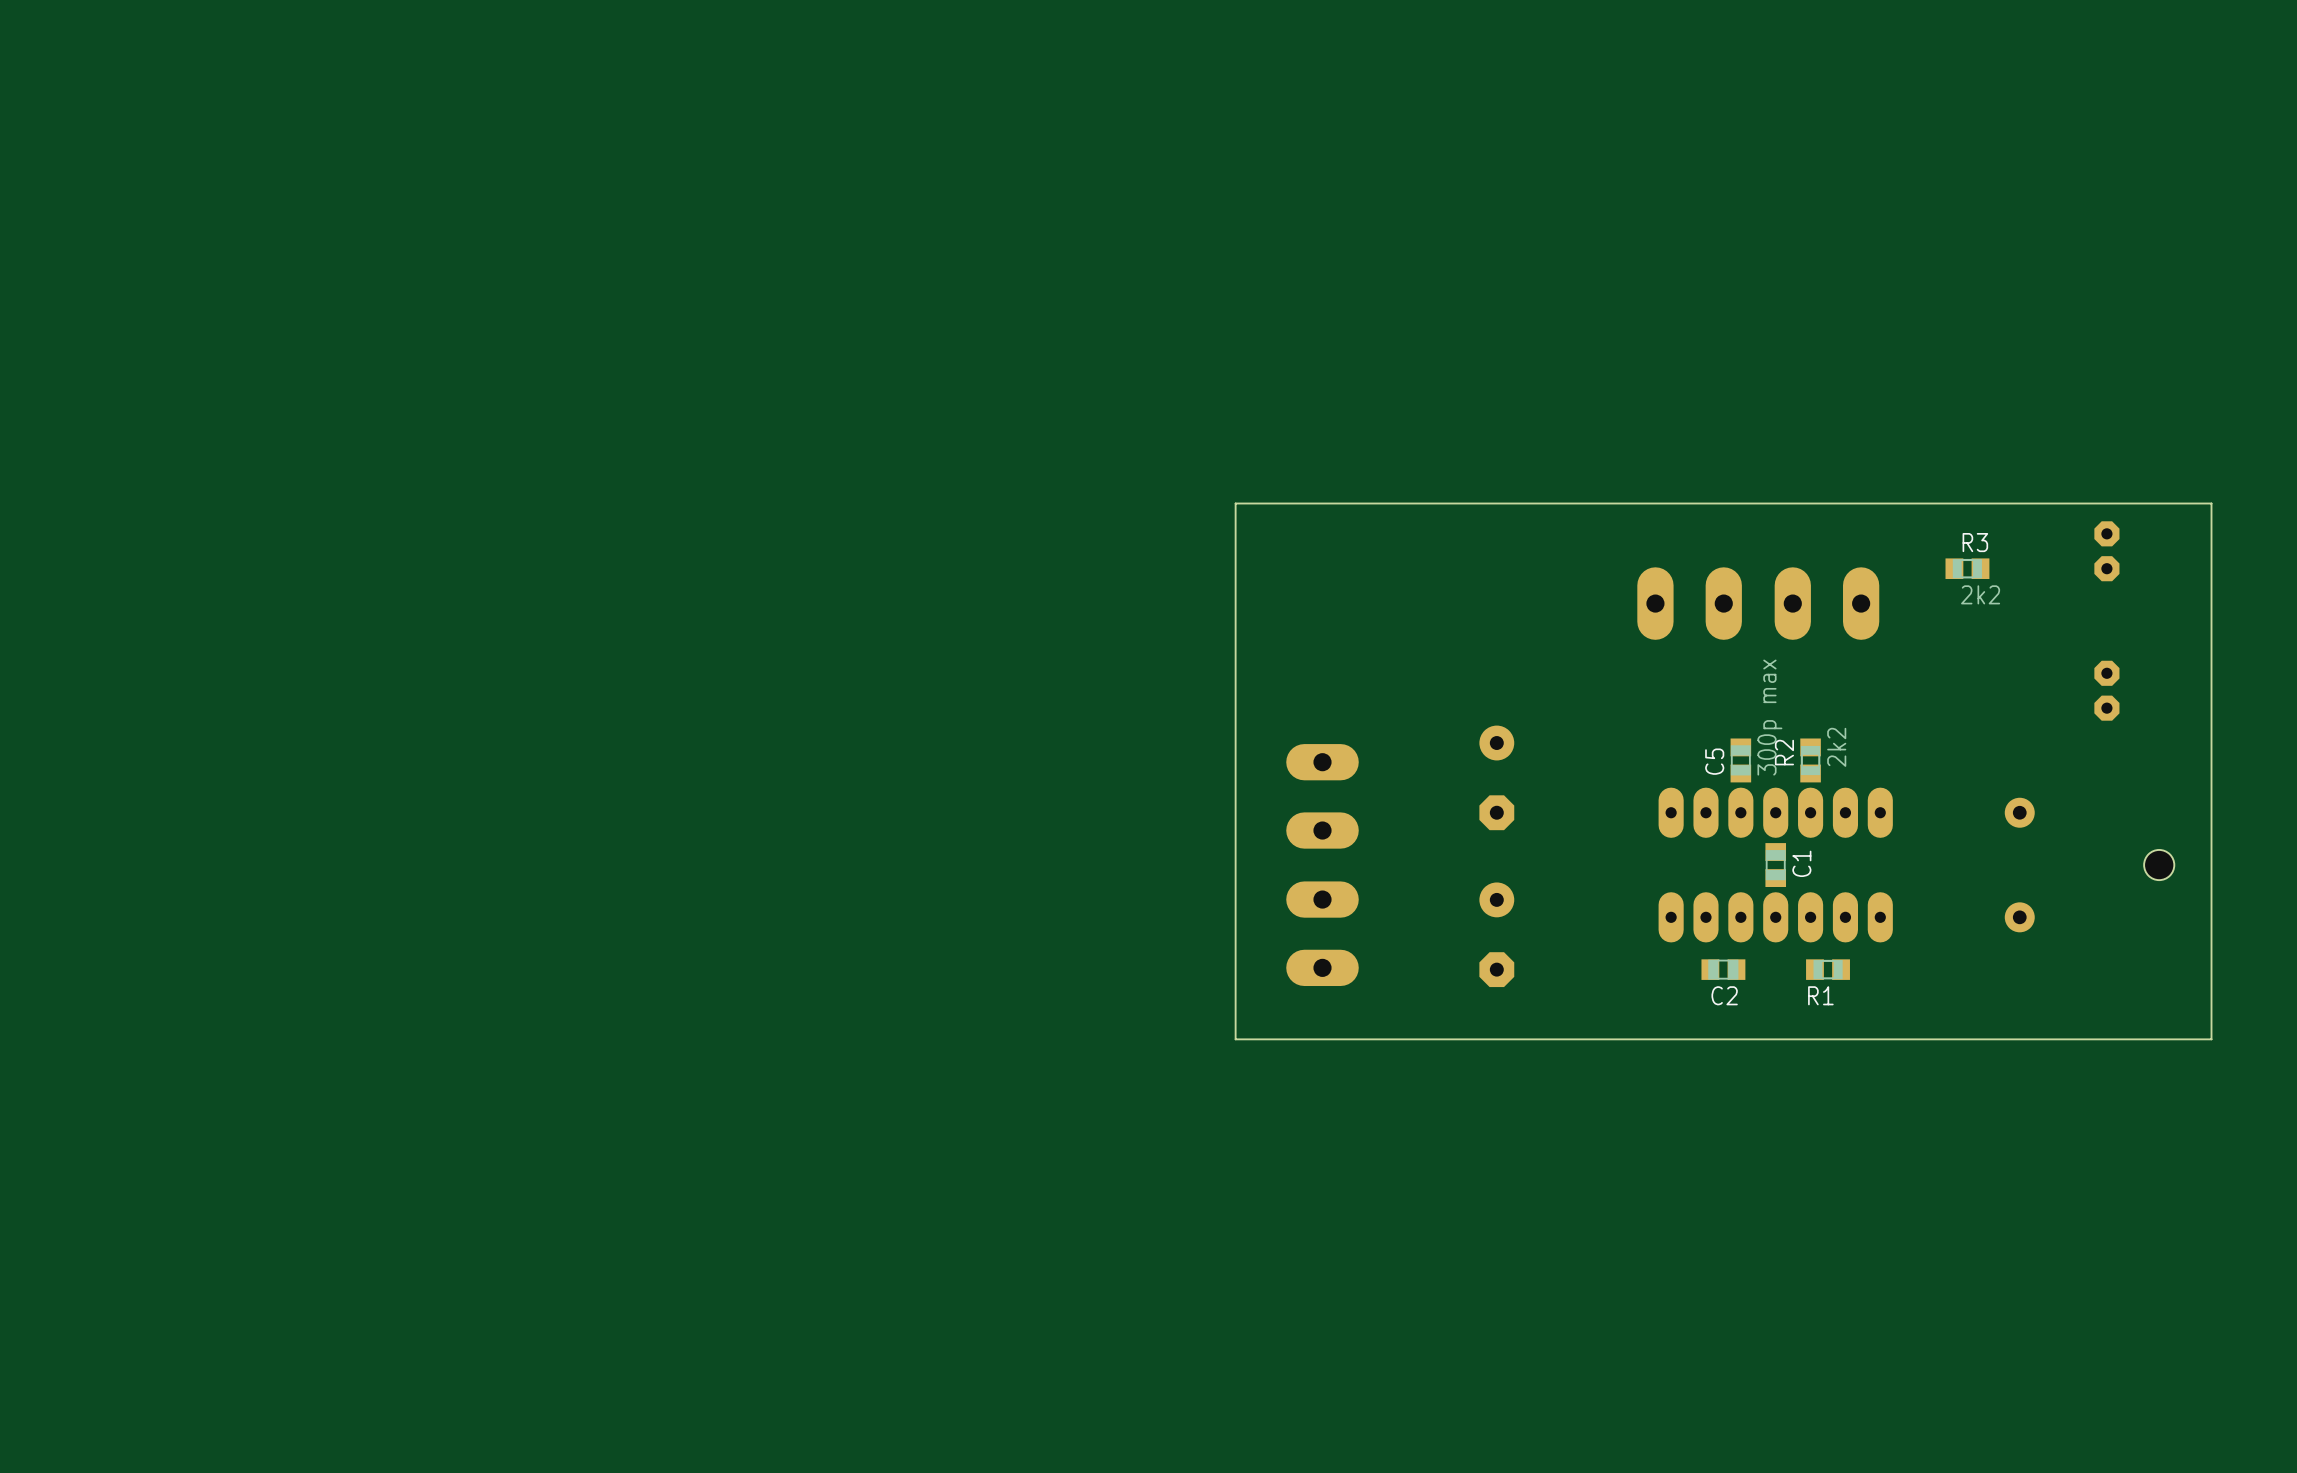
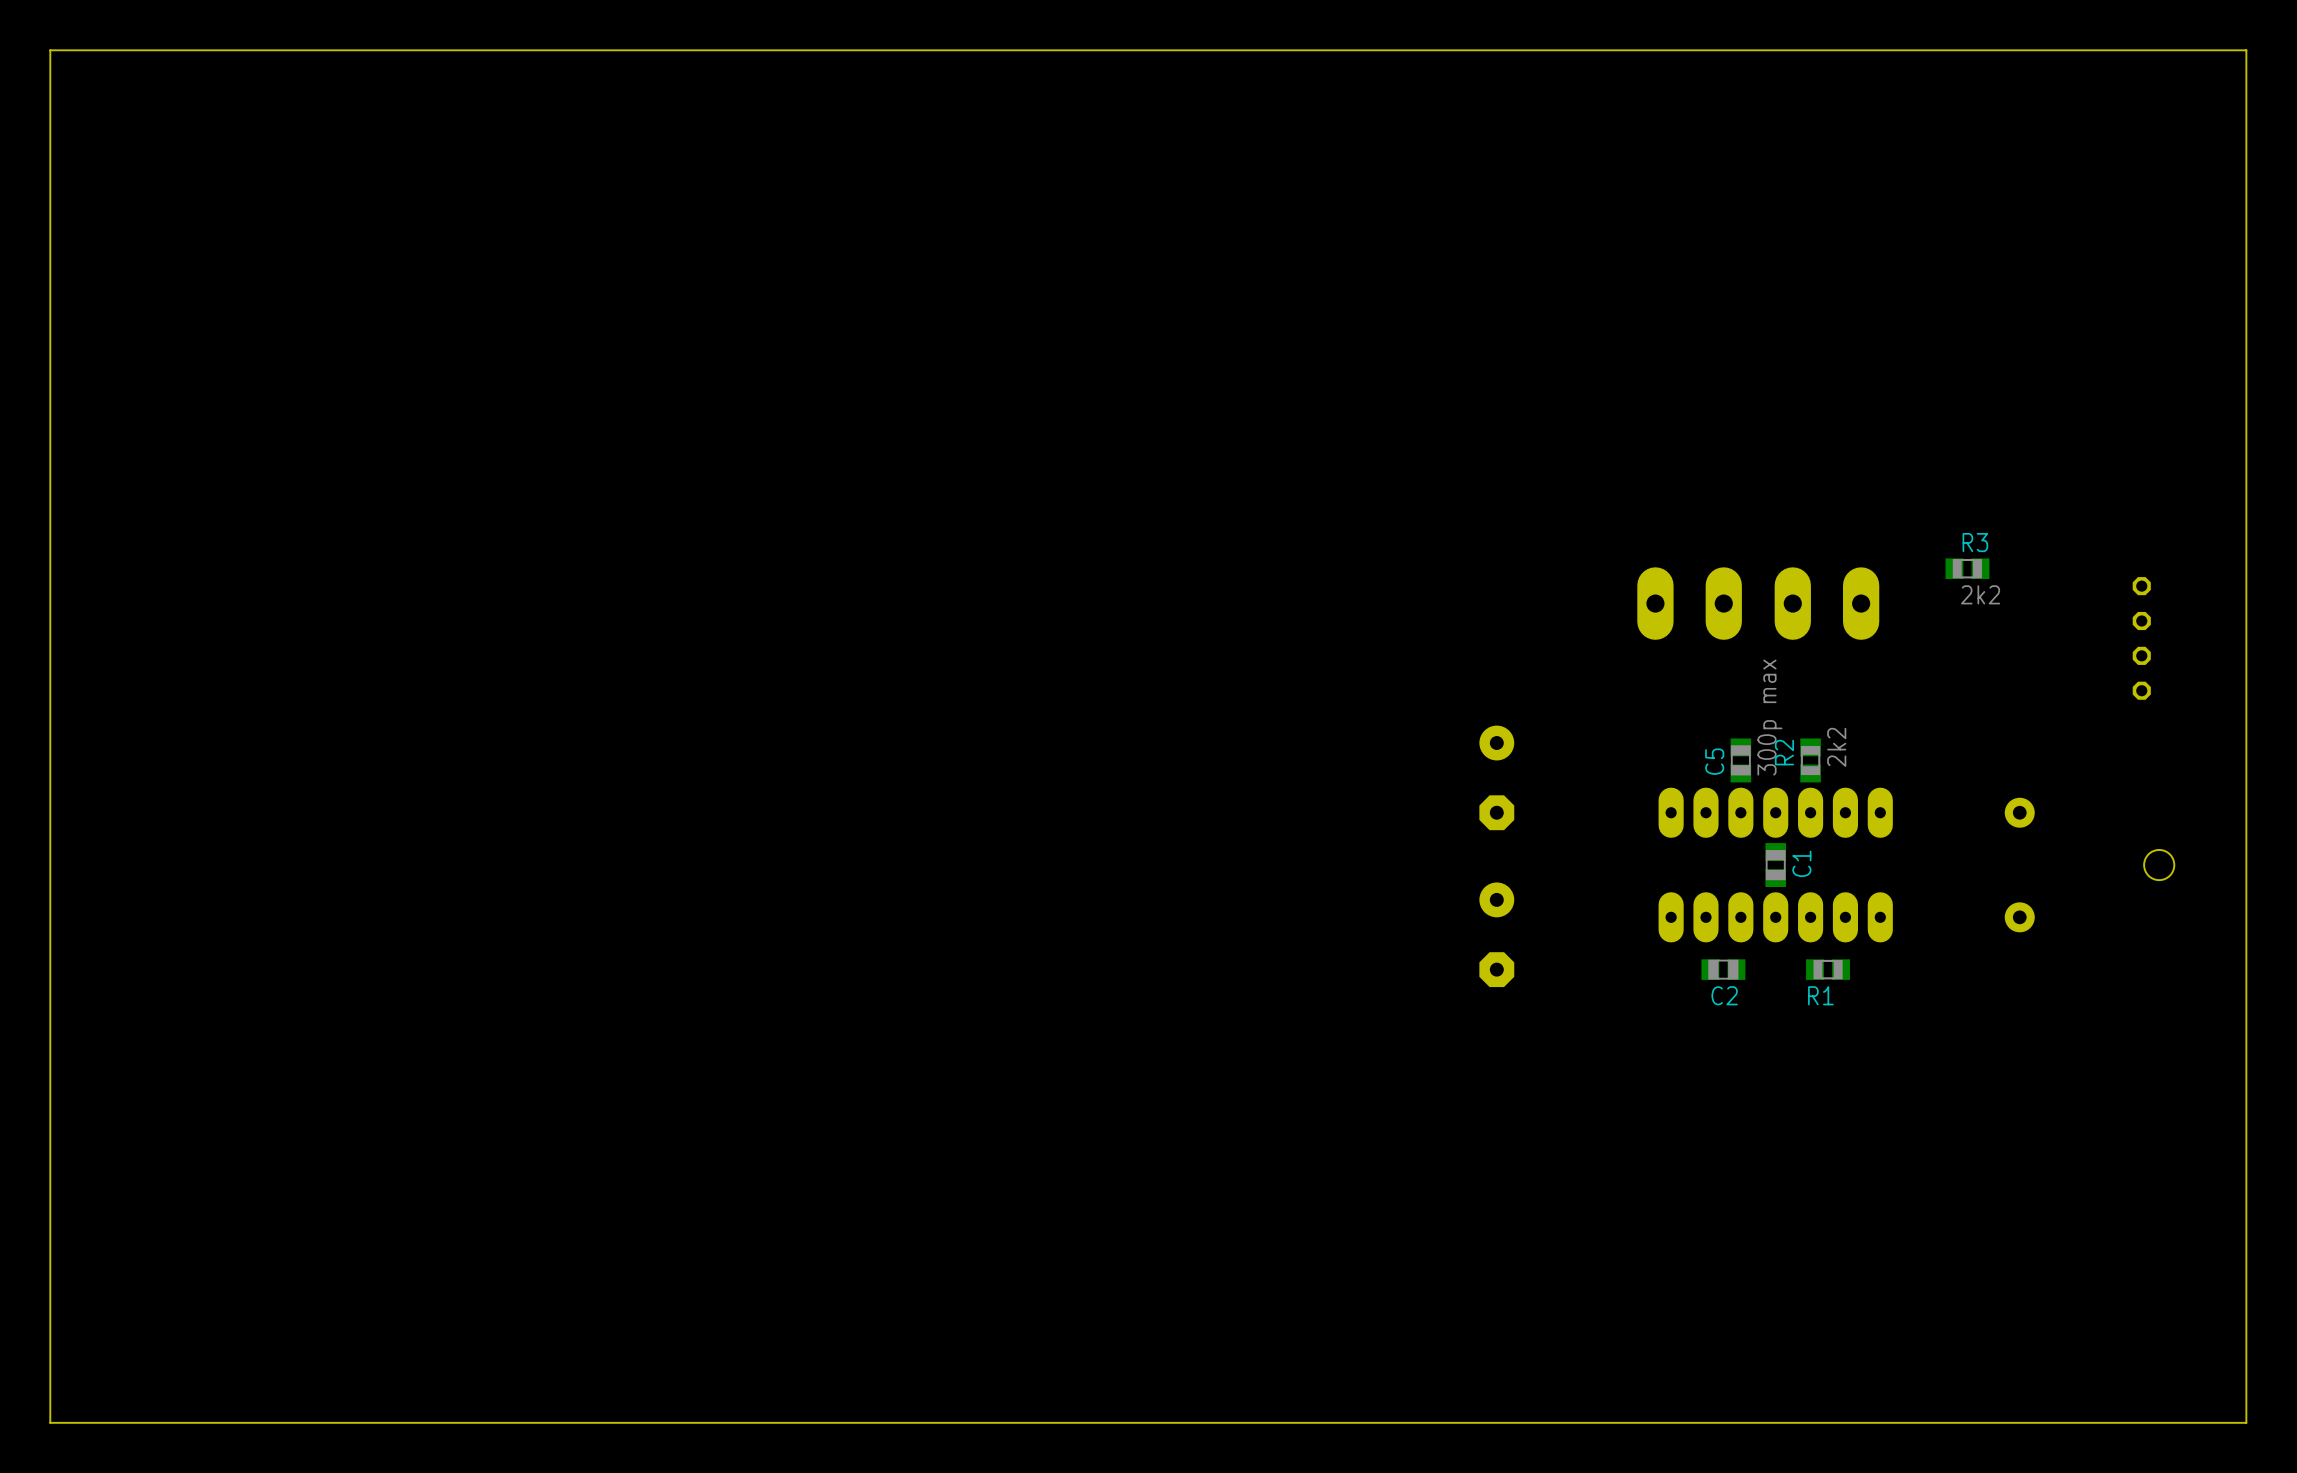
board edge: none -> (2246, 50) (50, 50) (50, 1422) (2246, 1422) (2246, 50)
board edge: (2211, 503) (1235, 503) (1235, 1039) (2211, 1039) (2211, 503) -> none
part: (2106, 551) -> none
part: none -> (2141, 603)
part: none -> (2141, 673)
part: (2106, 690) -> none
part: (1322, 865) -> none

